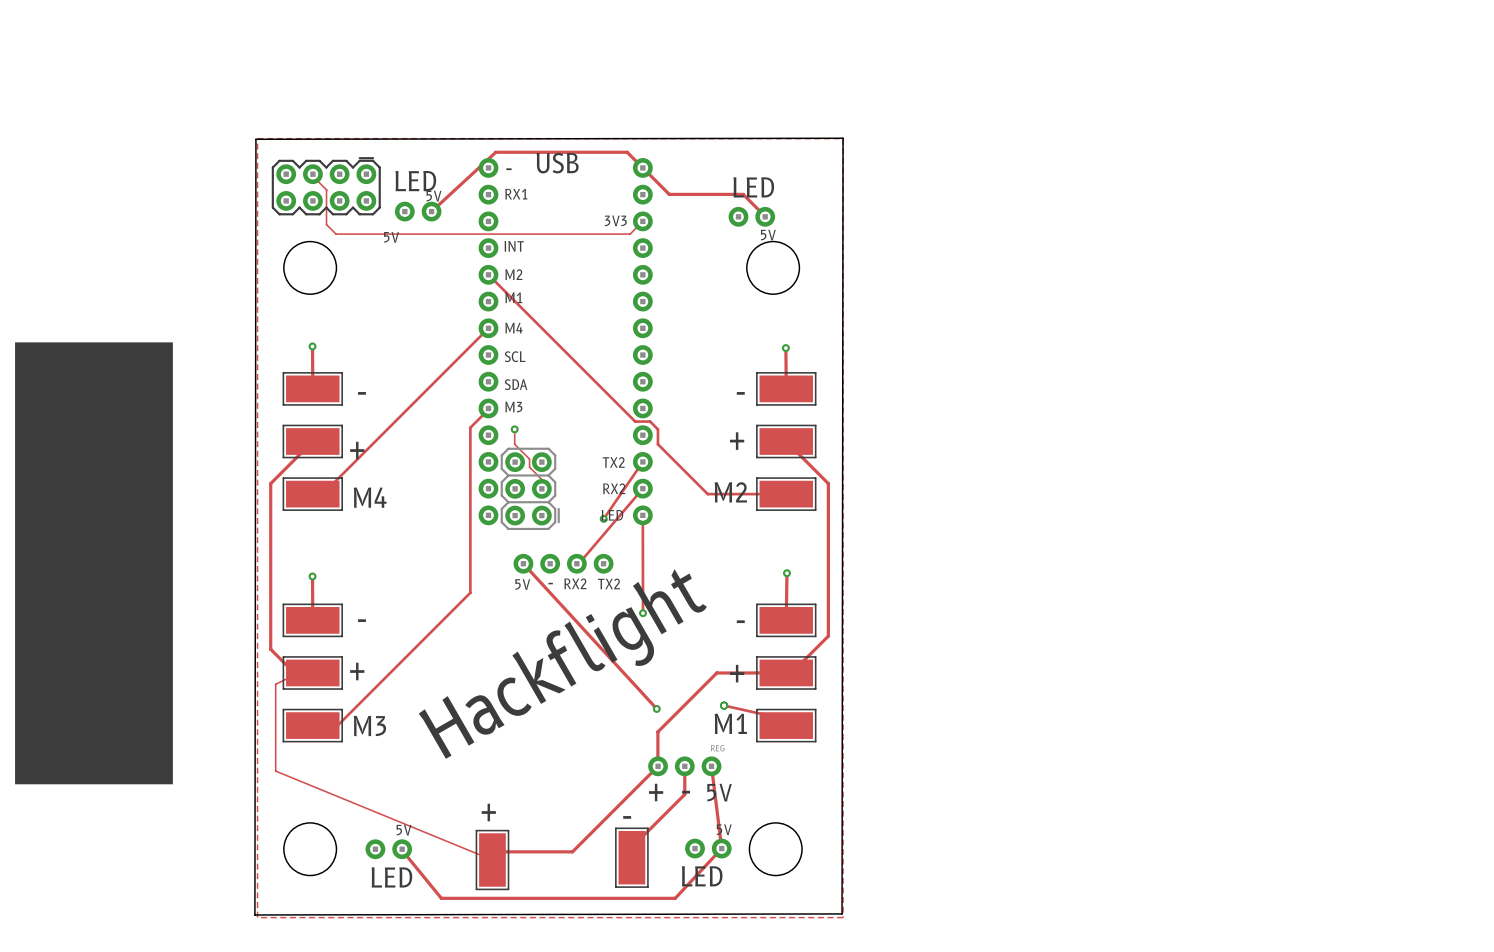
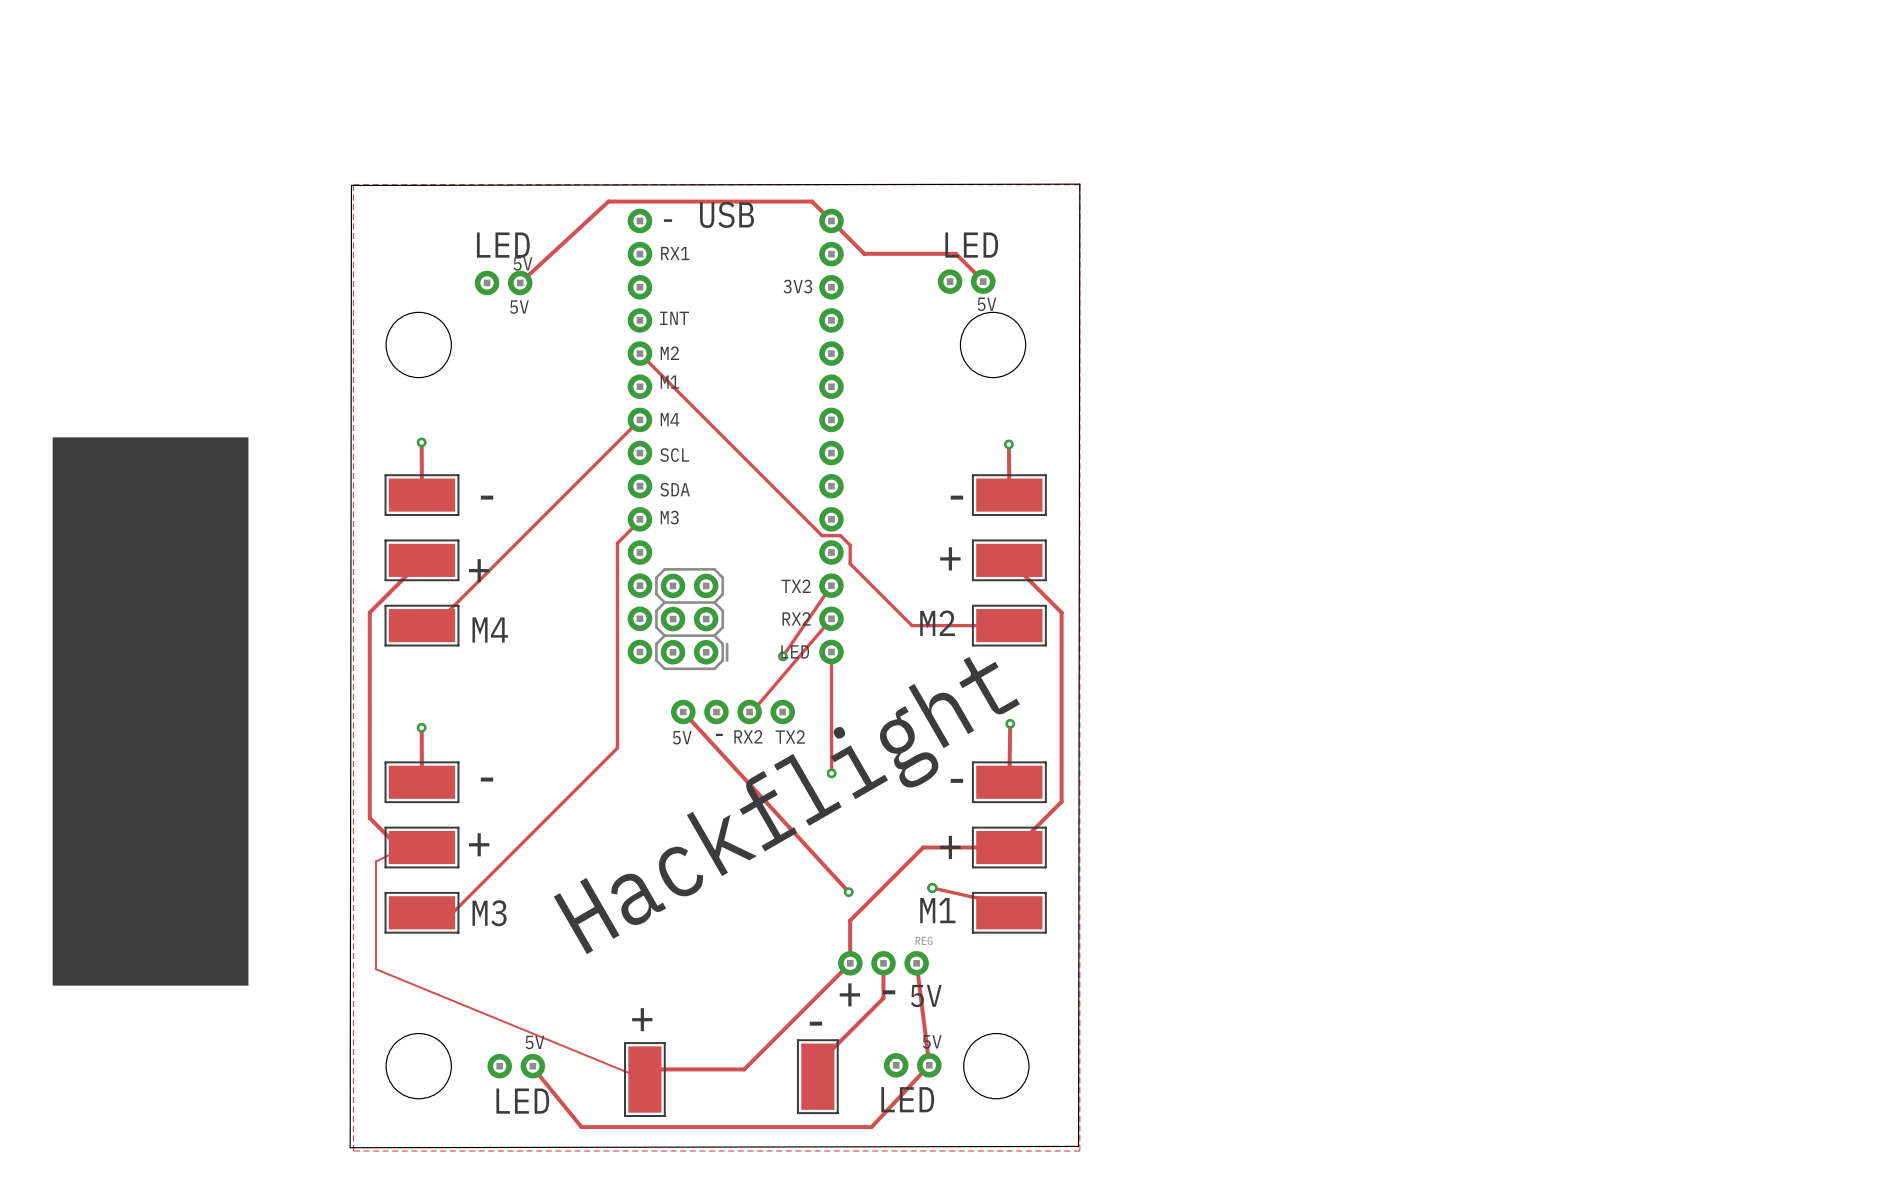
track: (495, 152) (431, 211) -> (649, 201) (608, 201) (520, 282)
track: (312, 174) (326, 190) (326, 224) (336, 234) (630, 234) (642, 221) -> none
text position: LED (415, 181) -> LED (503, 245)
part: (326, 186) -> none
text position: 5V (433, 196) -> 5V (523, 263)
part position: (418, 211) -> (503, 282)
track: (514, 429) (514, 444) (529, 459) (529, 467) (541, 479) (541, 488) -> none
via: (514, 429) -> none

